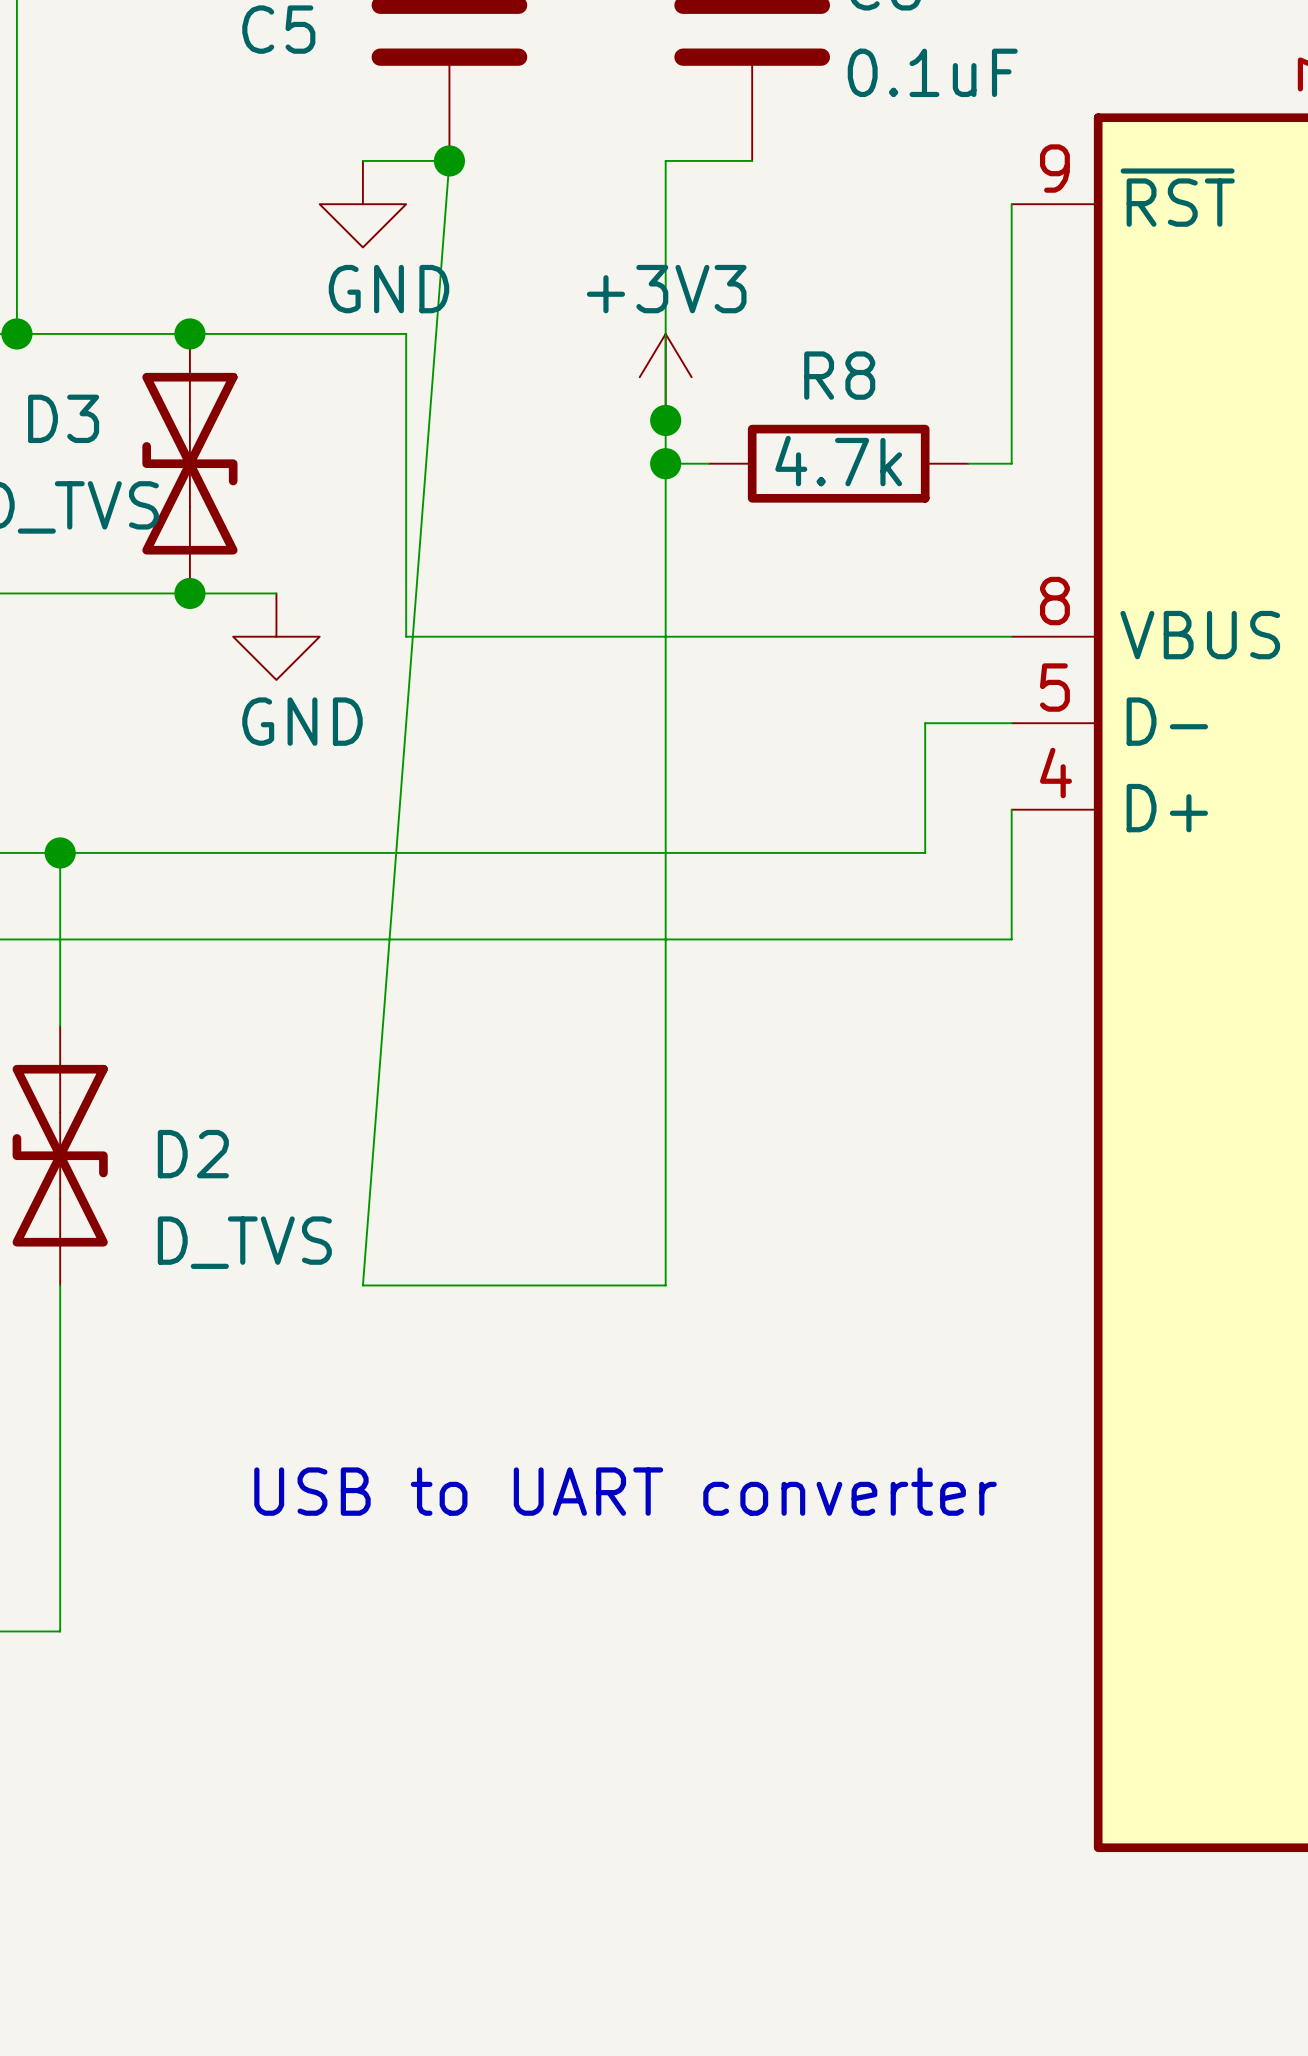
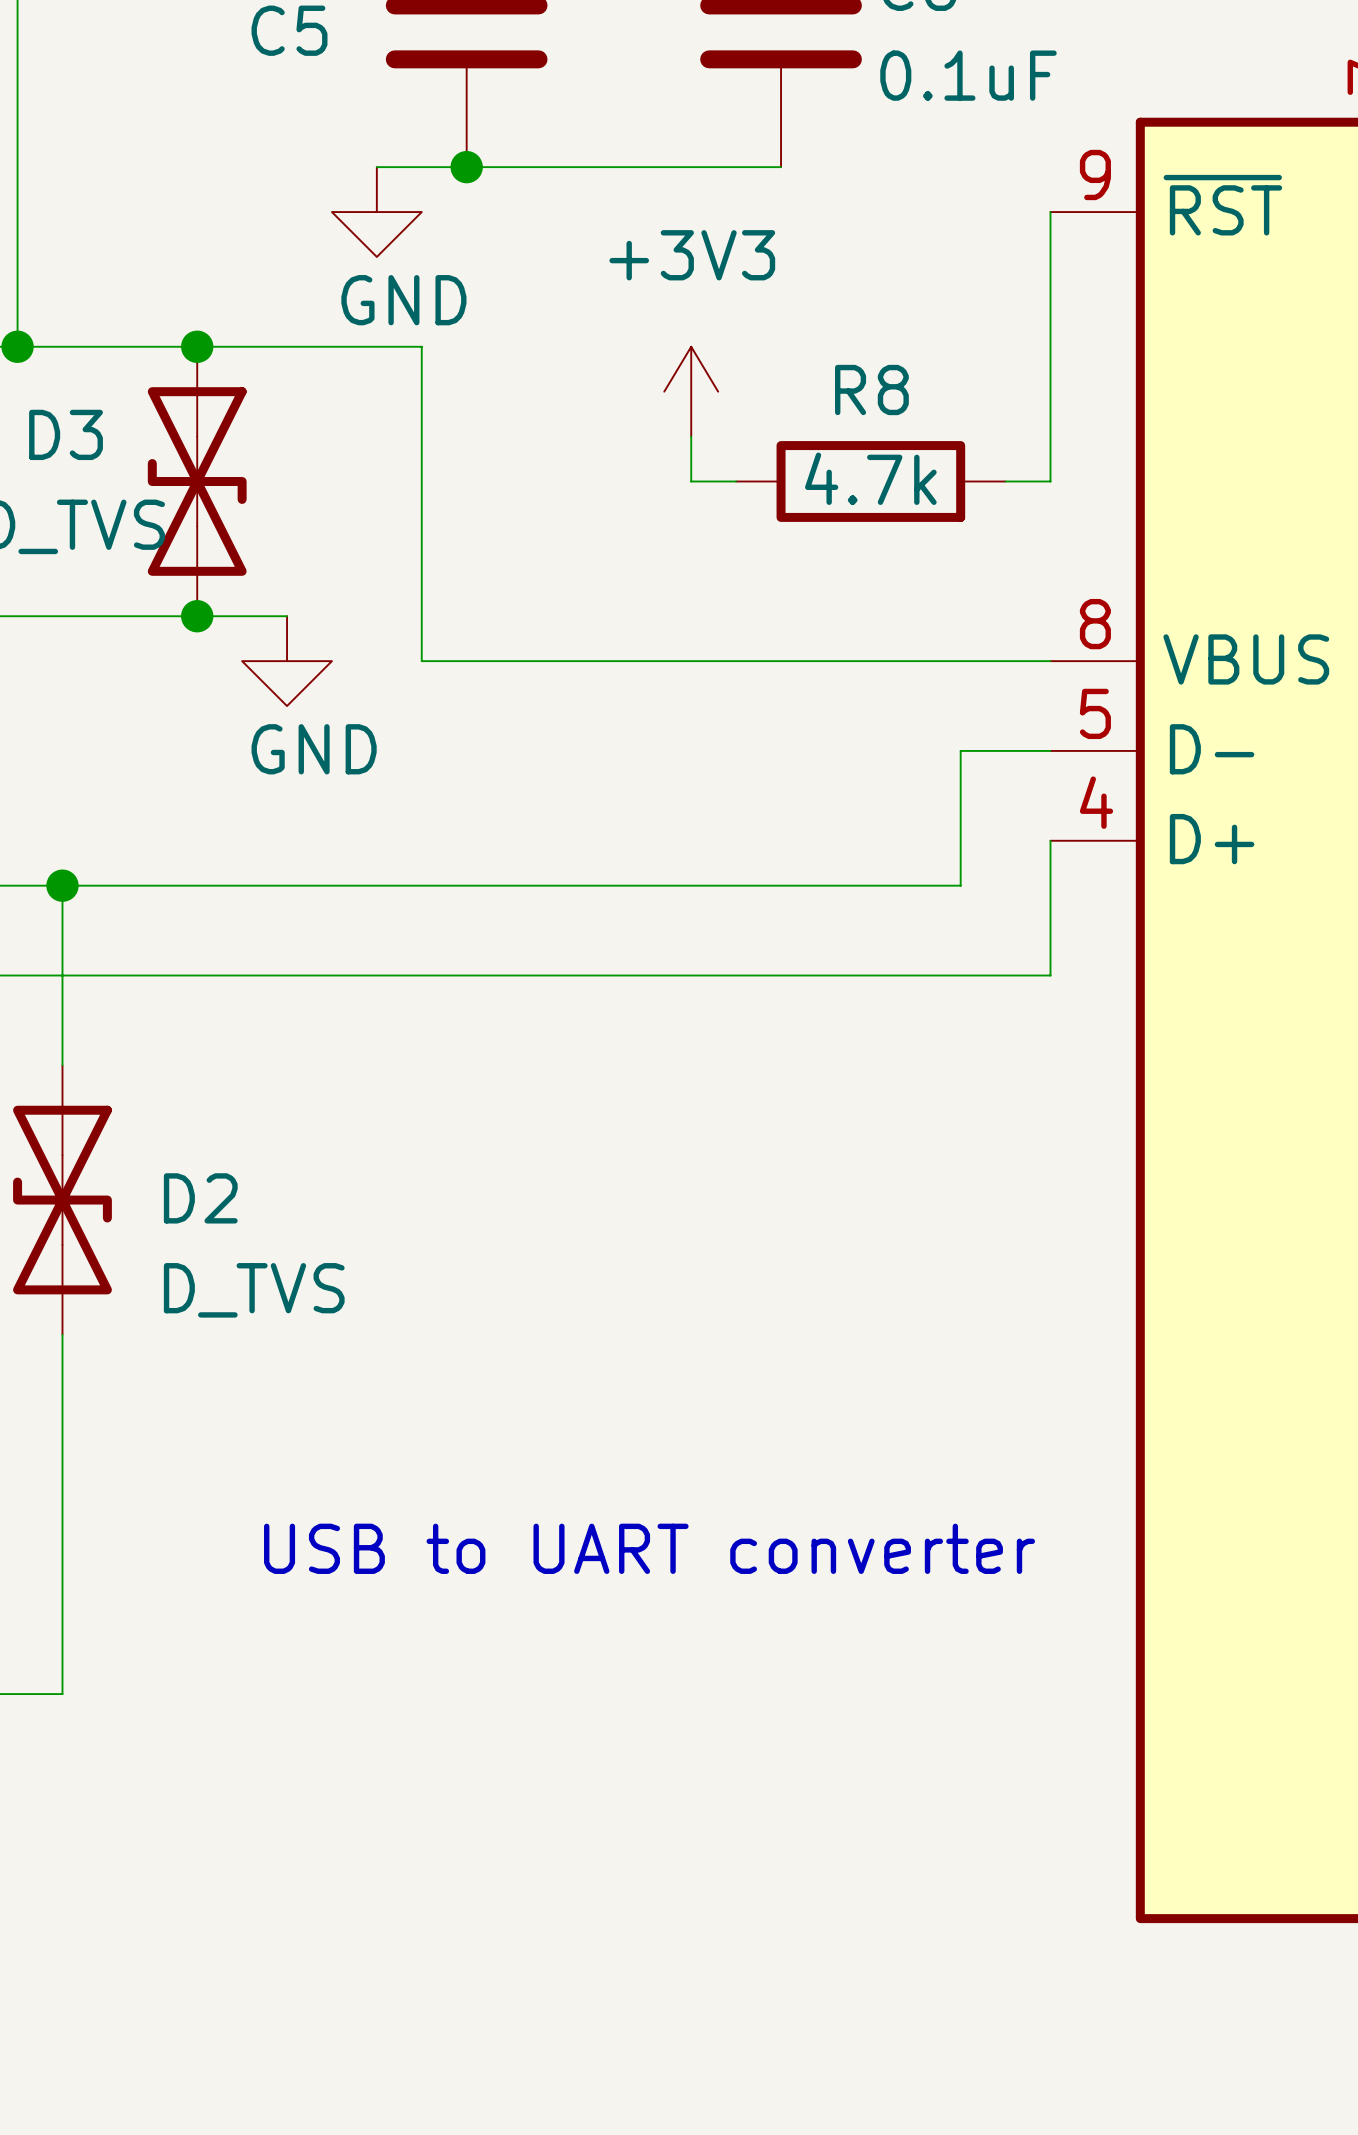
wire: (449, 160) (362, 1285) (665, 1285) (665, 463) -> (466, 167) (691, 167)
wire: (665, 160) (665, 420) -> none
power symbol text position: +3V3 (666, 289) -> +3V3 (692, 255)
junction: (665, 420) -> none
junction: (665, 463) -> none

